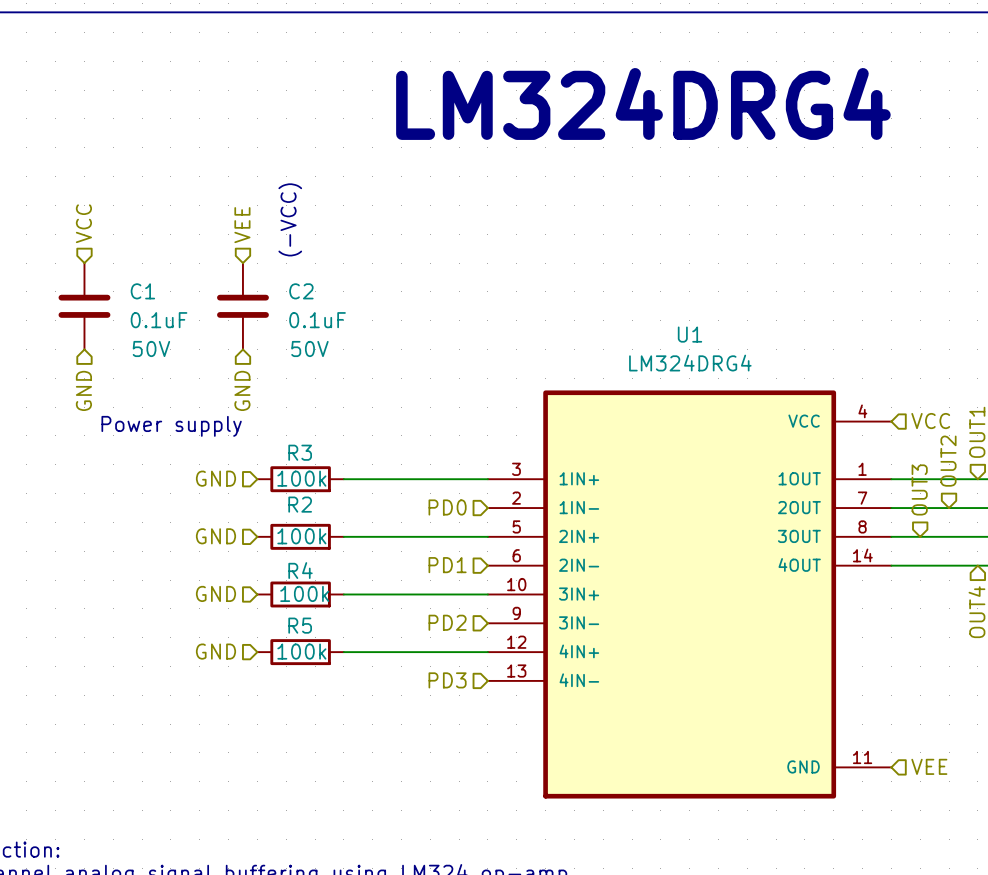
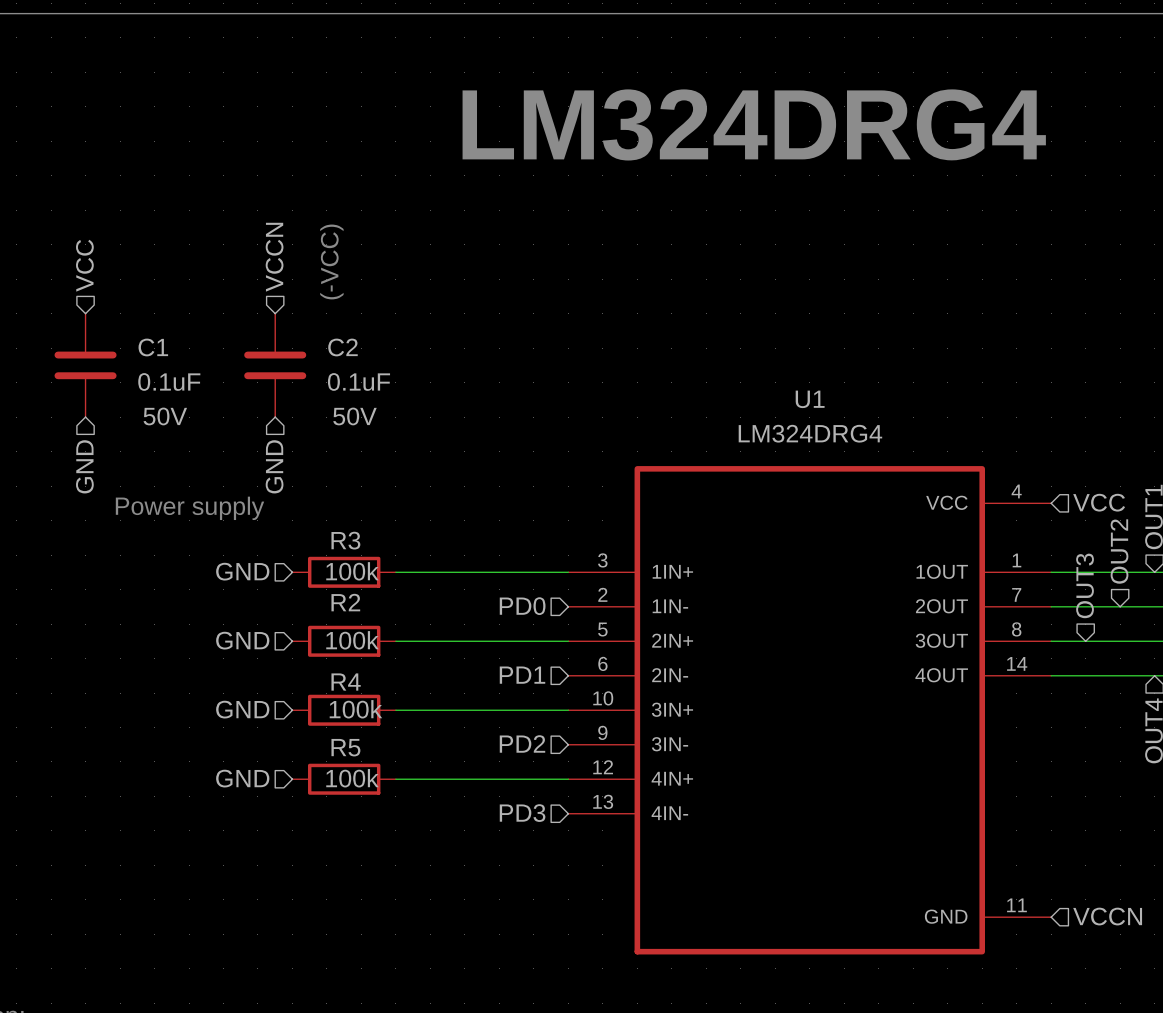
hierarchical label: VEE (242, 225) -> VCCN (274, 257)
hierarchical label: VEE (929, 766) -> VCCN (1107, 916)

